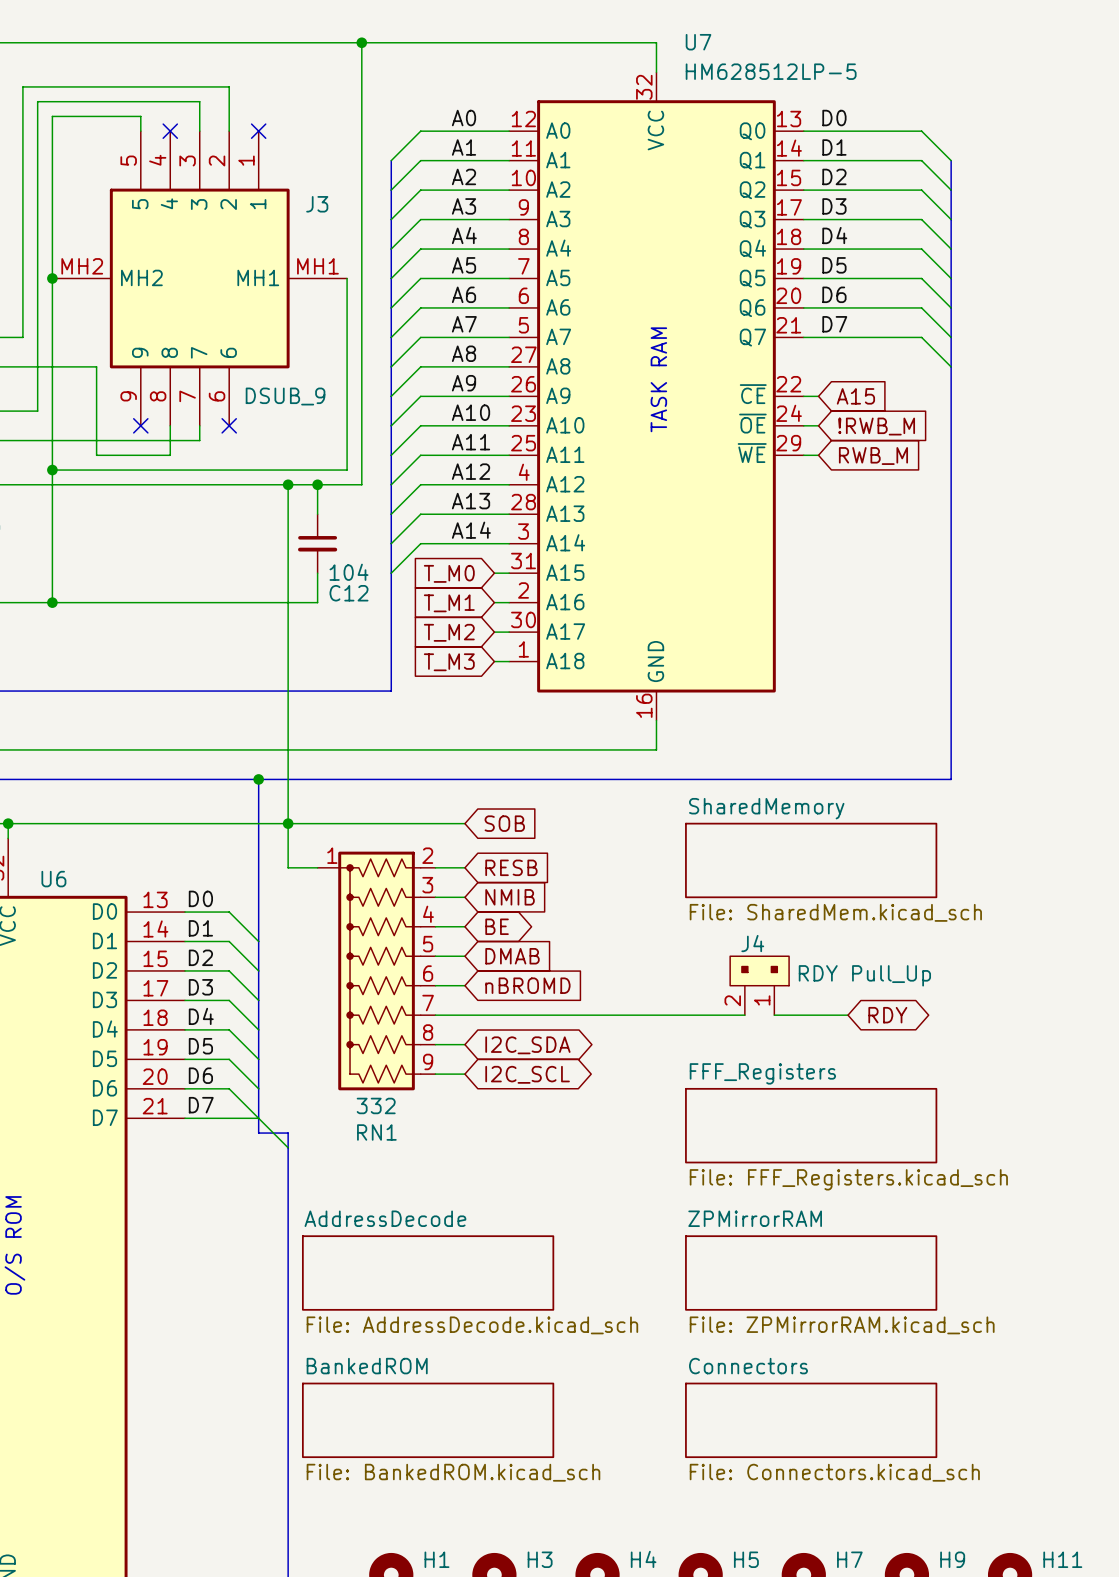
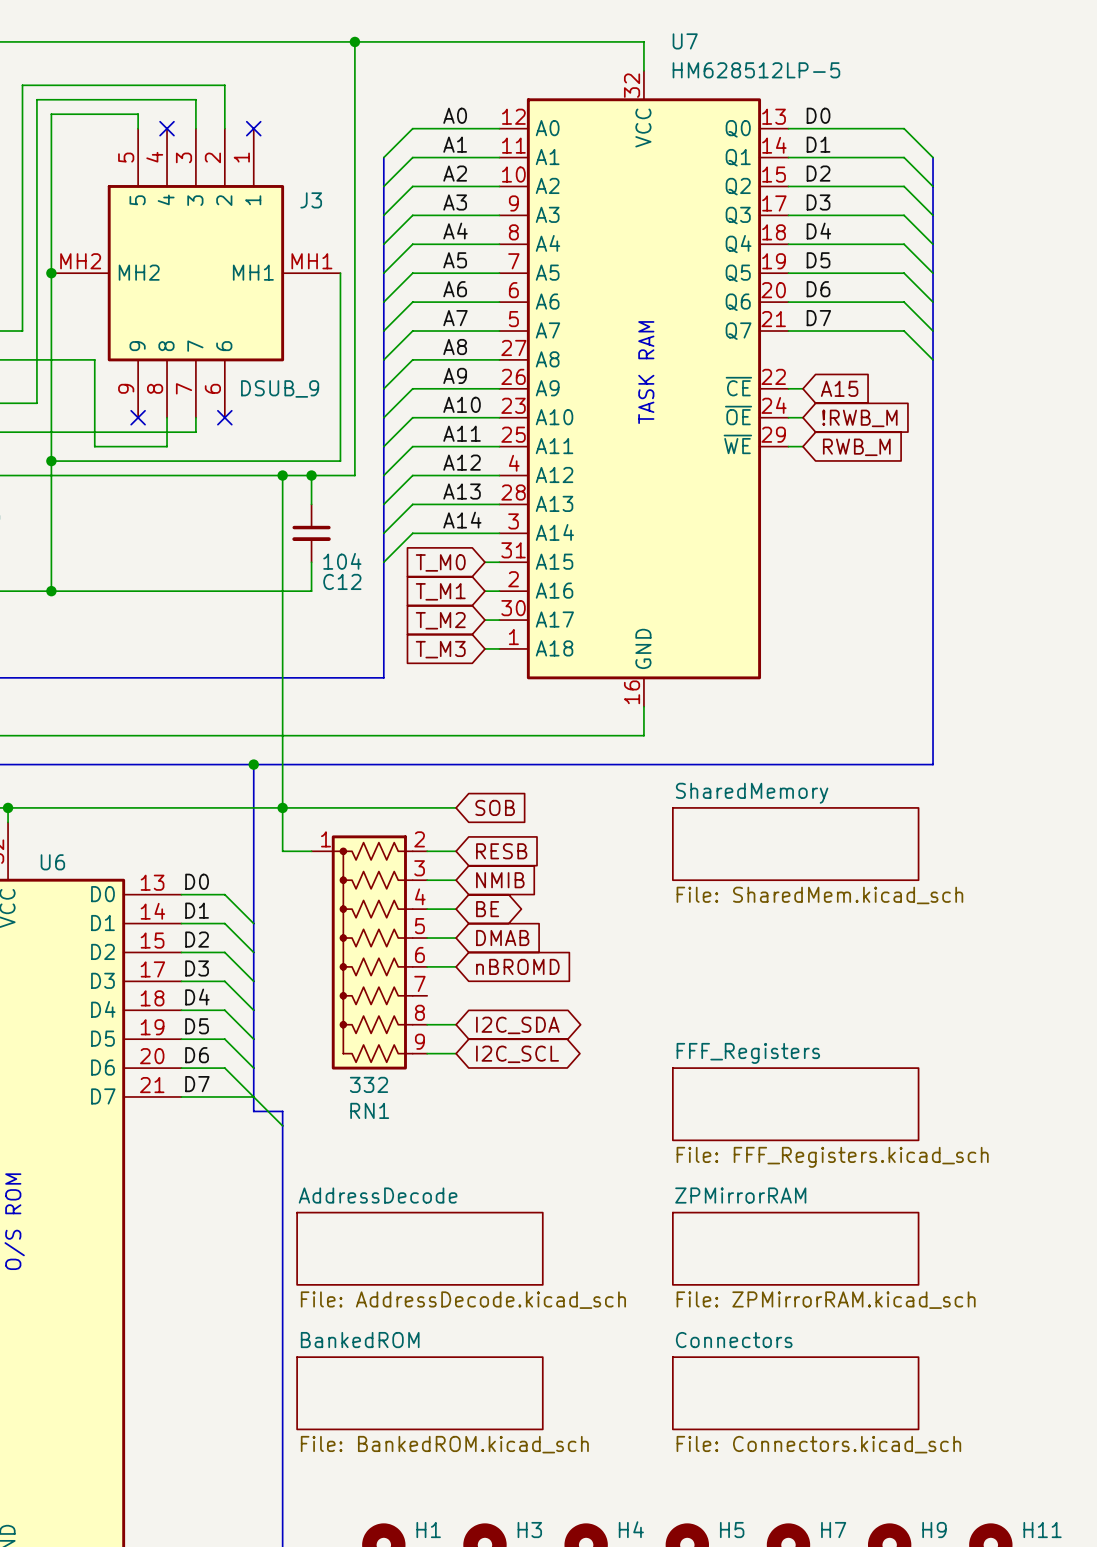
J4: RDY Pull_Up (759, 985) -> none
wire: (435, 1015) (744, 1015) -> none
wire: (774, 1015) (848, 1015) -> none
global label: RDY (887, 1015) -> none

